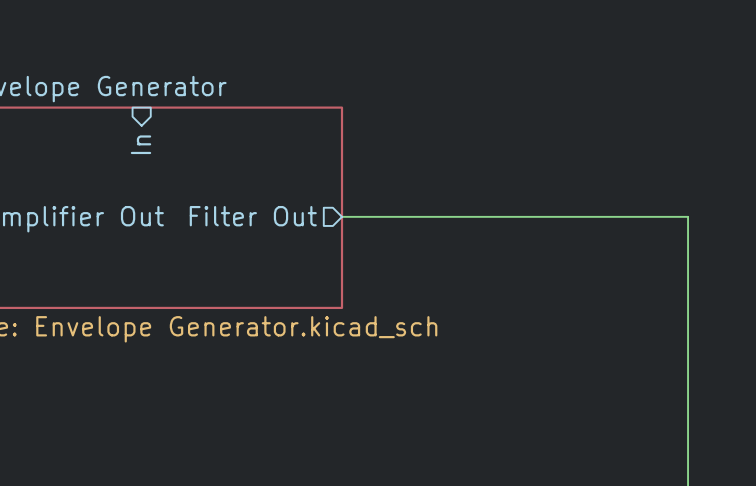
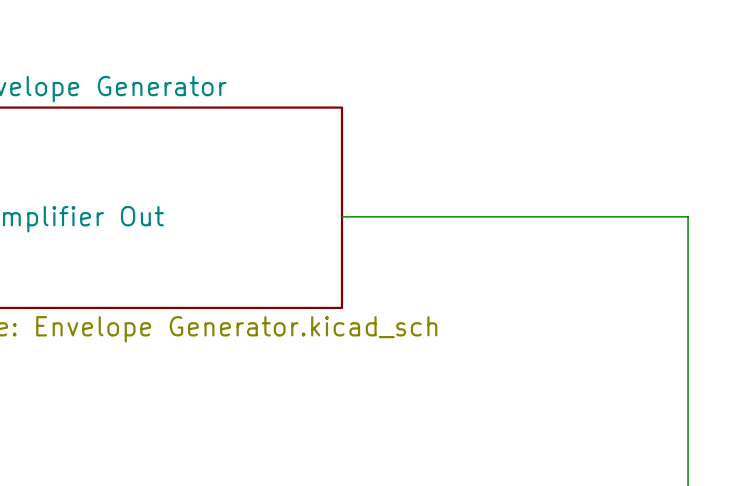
sheet pin: In (140, 144) -> none
sheet pin: Filter Out (253, 216) -> none

